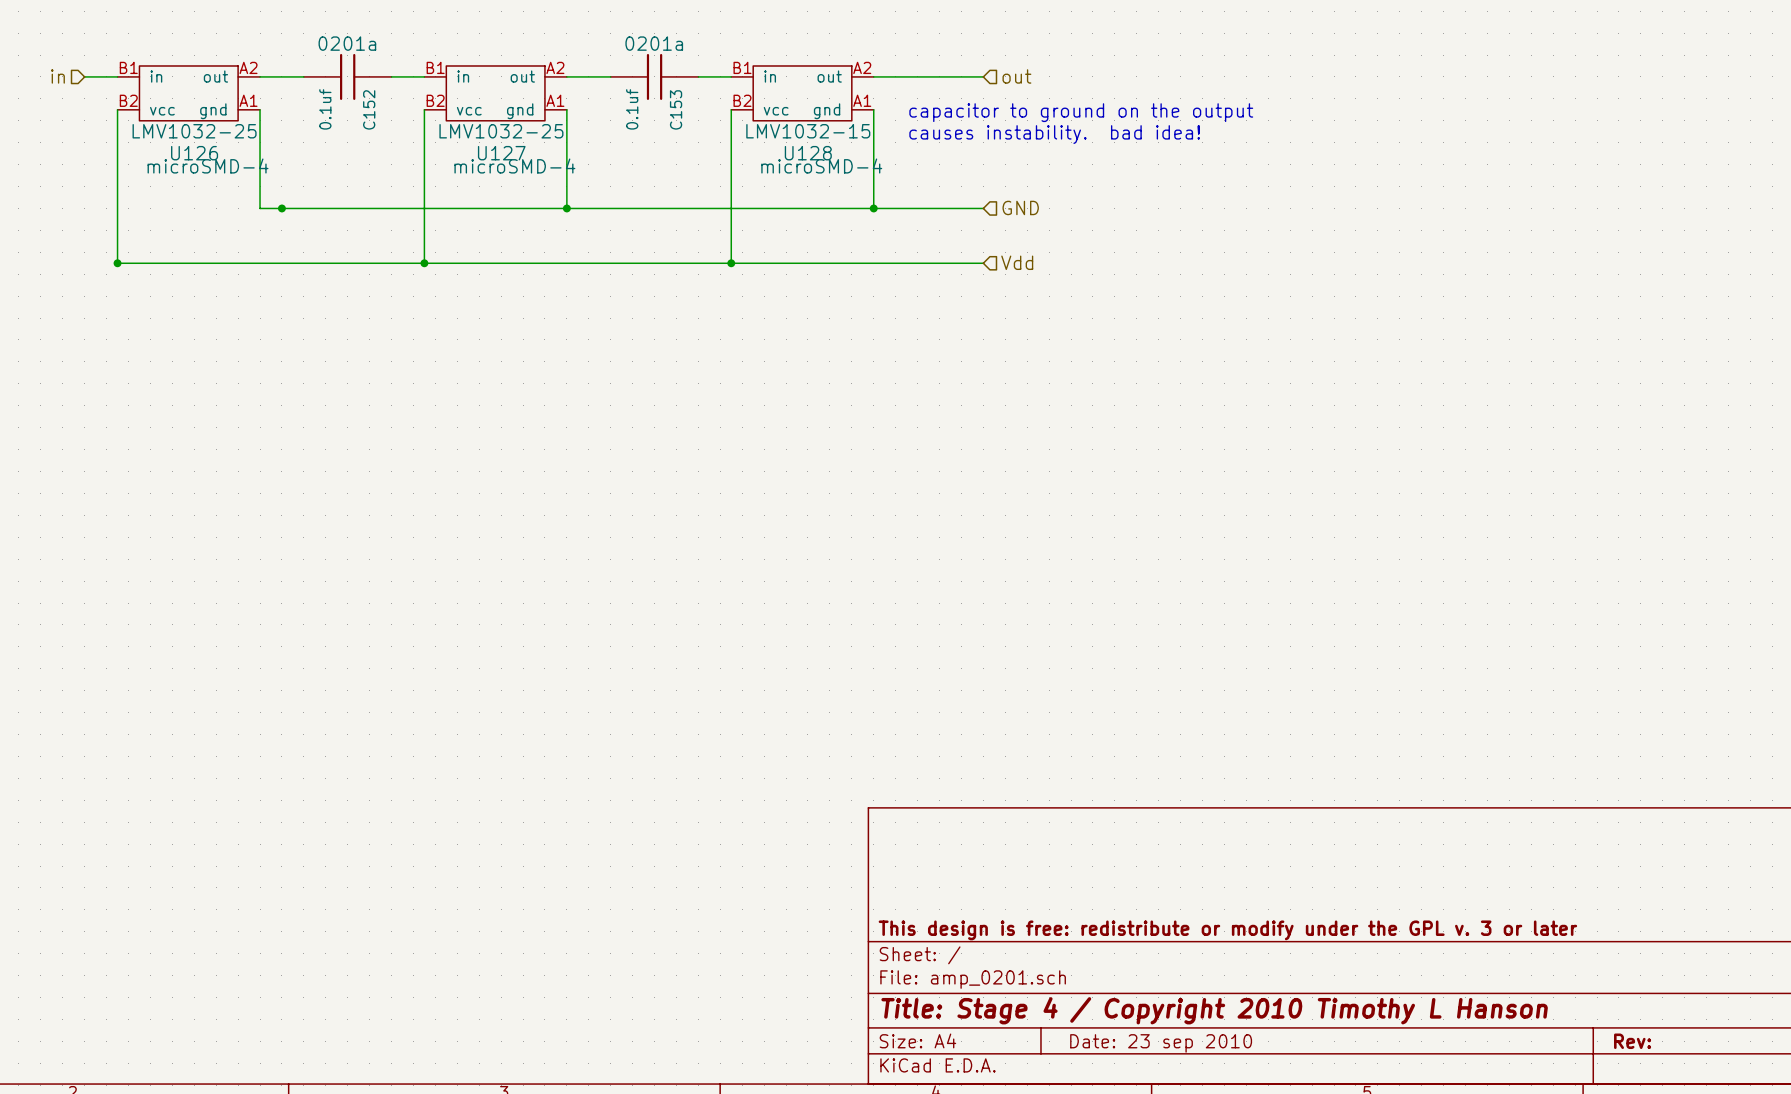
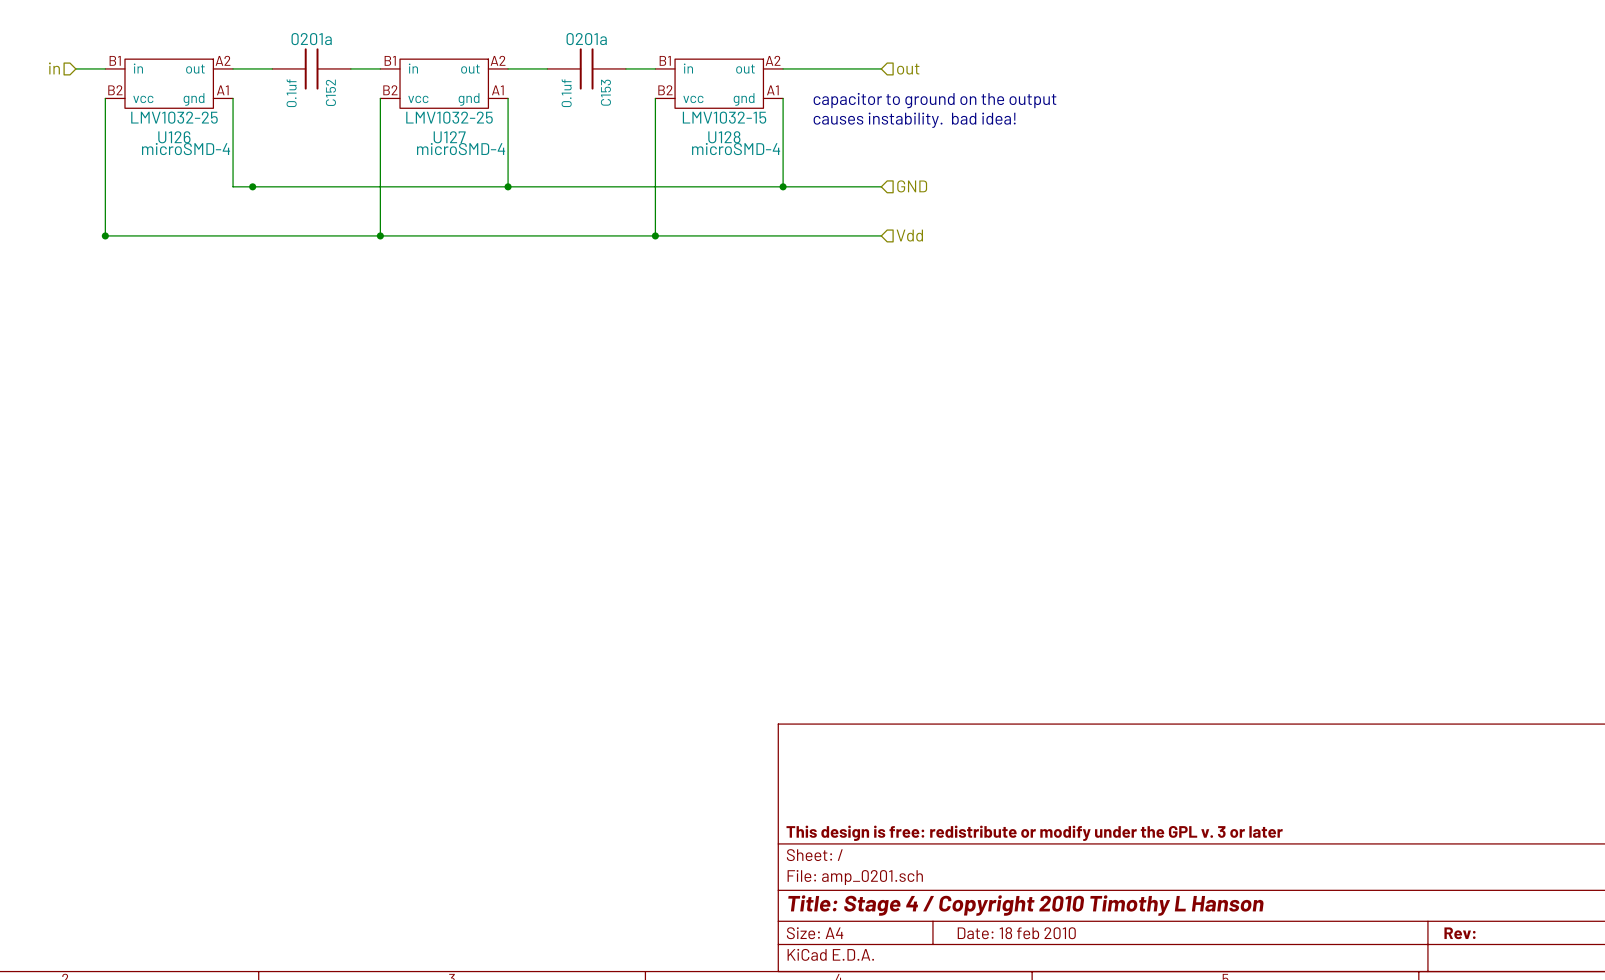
title block: Date: 23 sep 2010 (1161, 1043) -> Date: 18 feb 2010 (1016, 933)

